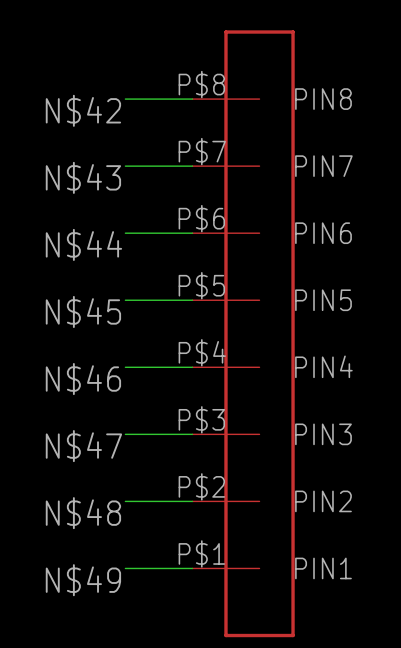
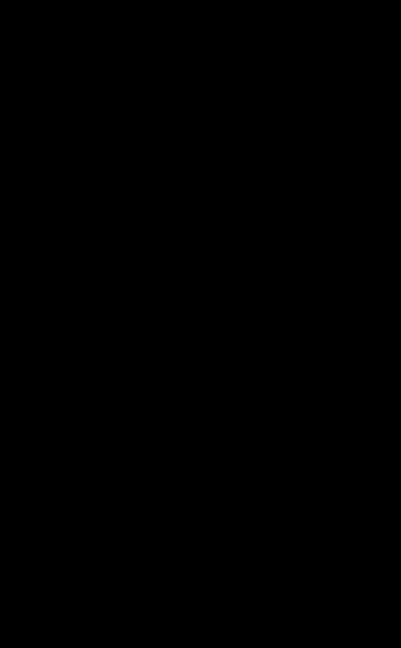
wire: (125, 99) (192, 99) -> none
label: N$42 (83, 110) -> none
wire: (125, 166) (192, 166) -> none
label: N$43 (83, 177) -> none
wire: (125, 233) (192, 233) -> none
label: N$44 (83, 244) -> none
wire: (125, 300) (192, 300) -> none
label: N$45 (83, 311) -> none
part: (243, 333) -> none
wire: (125, 367) (192, 367) -> none
label: N$46 (83, 379) -> none
wire: (125, 434) (192, 434) -> none
label: N$47 (83, 446) -> none
wire: (125, 501) (192, 501) -> none
label: N$48 (83, 513) -> none
wire: (125, 568) (192, 568) -> none
label: N$49 (83, 580) -> none

